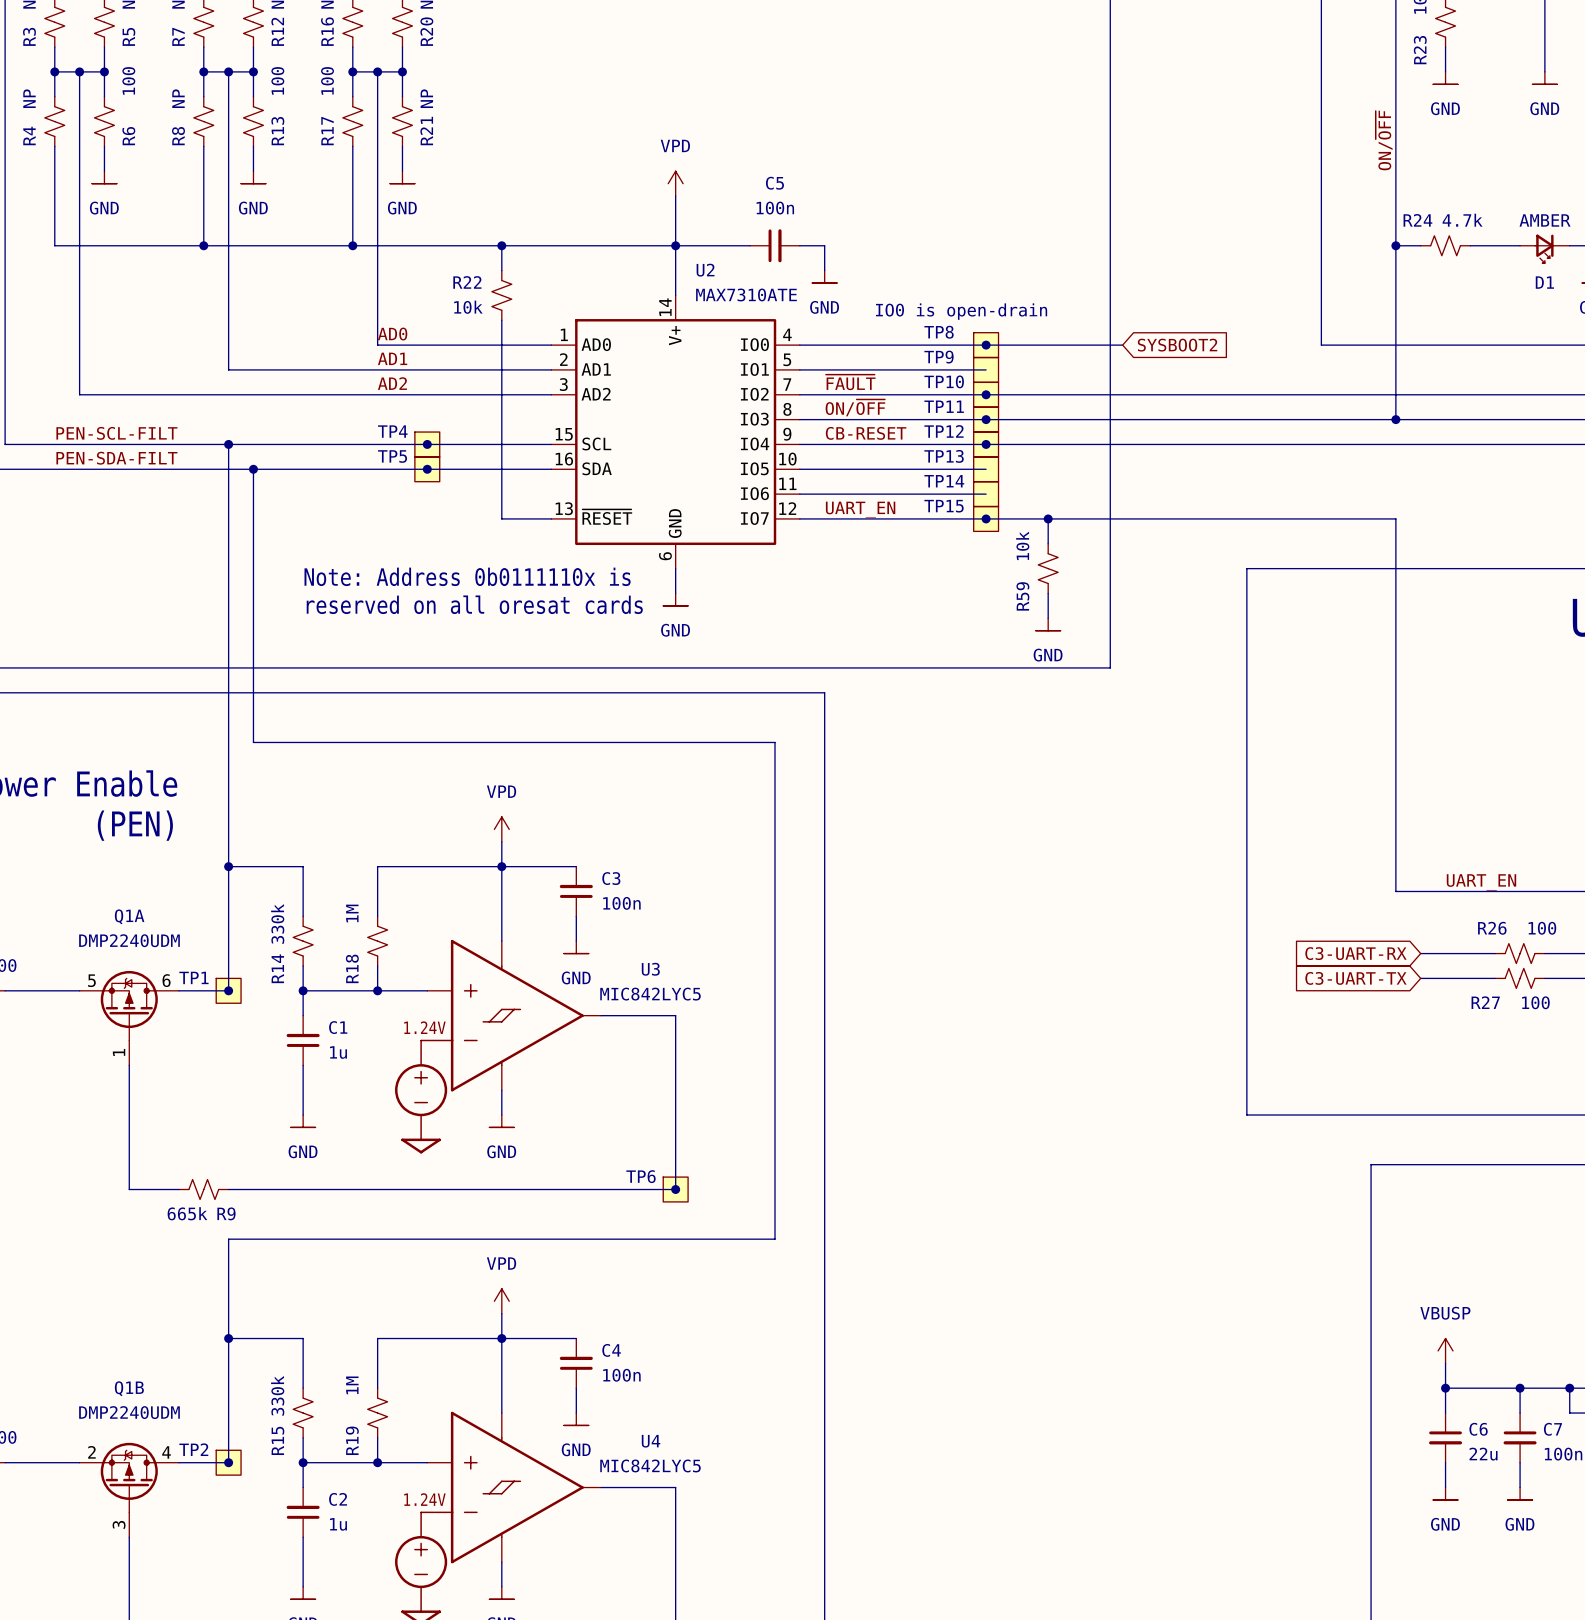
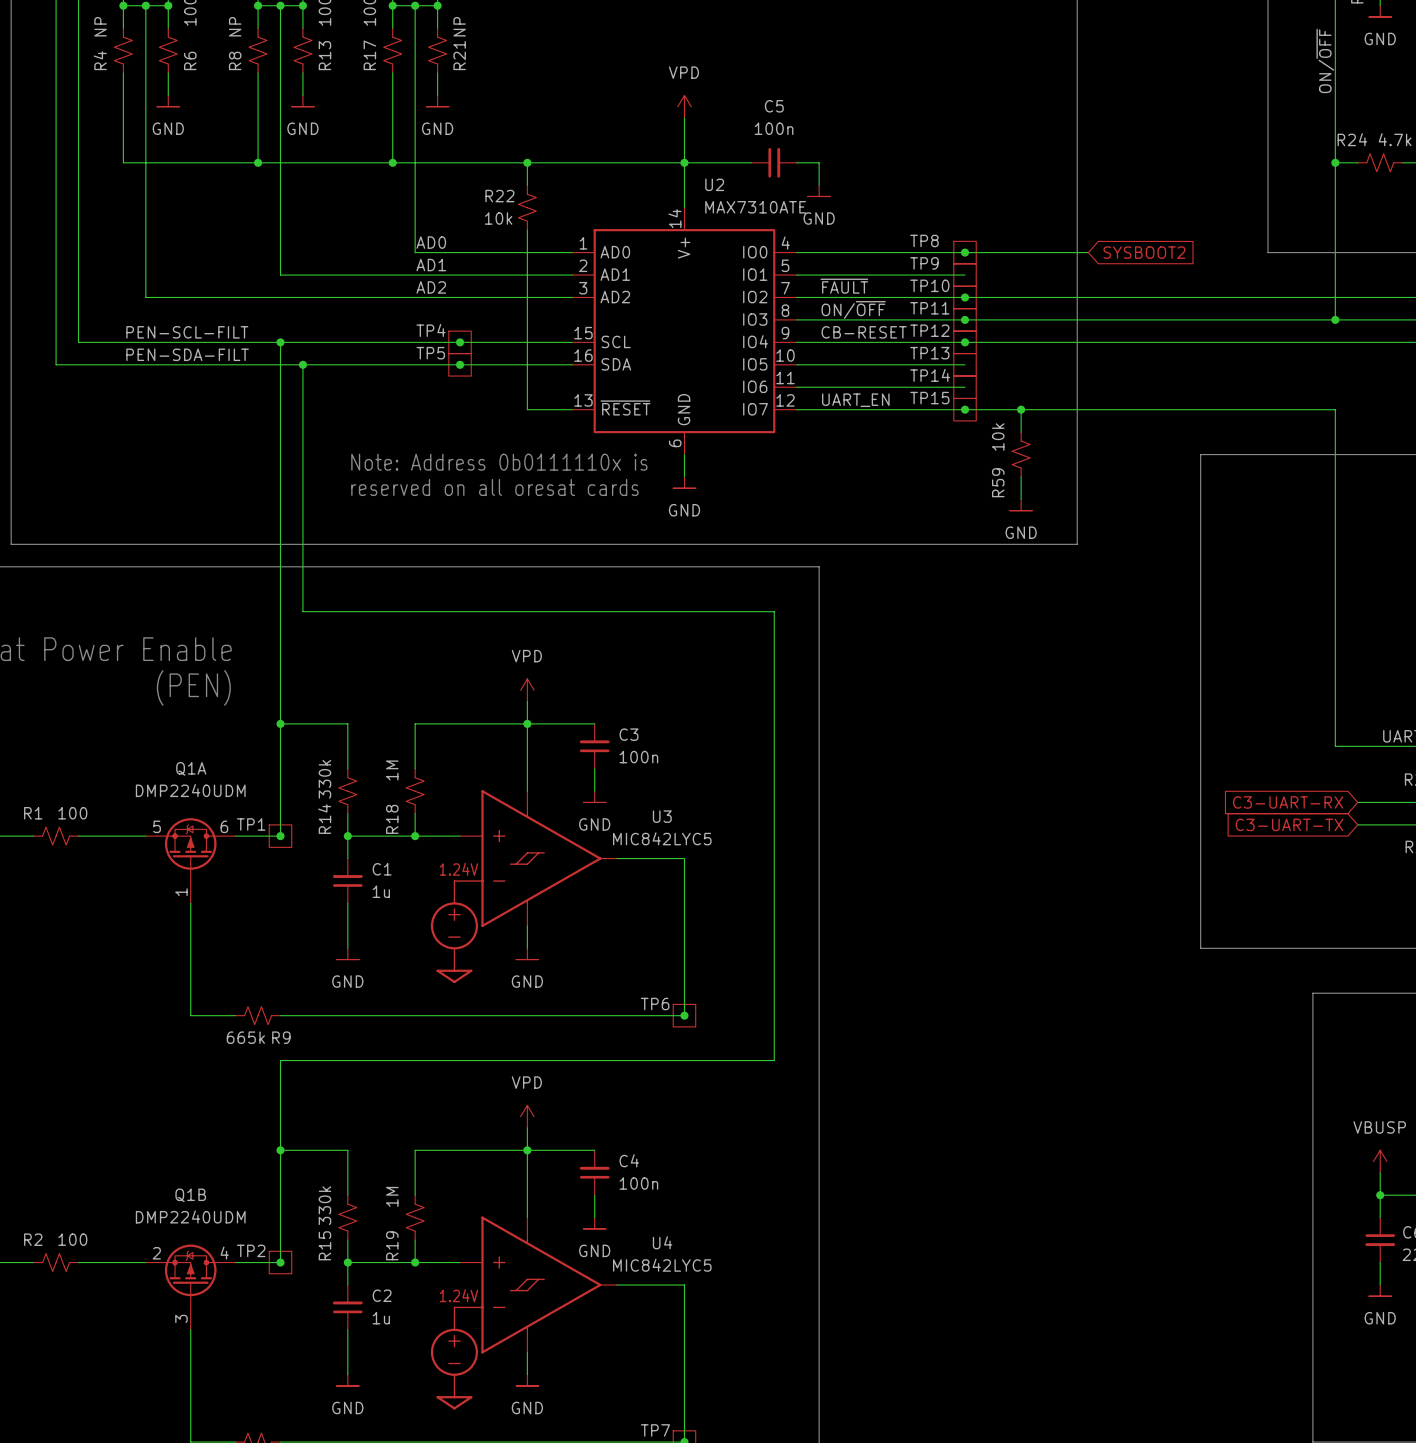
text: IO0 is open-drain (961, 311) -> none

